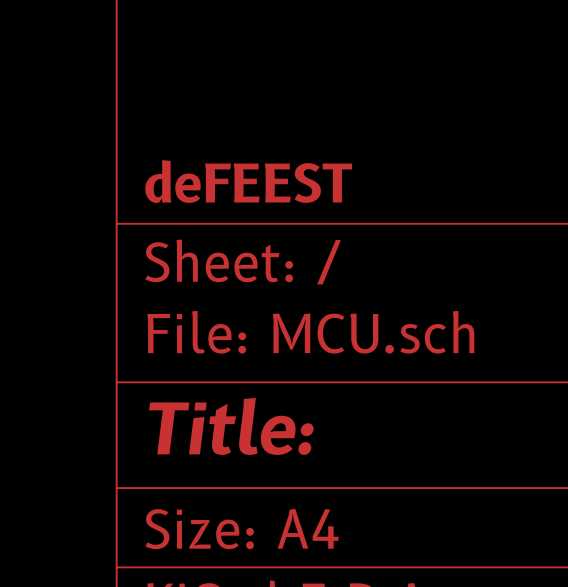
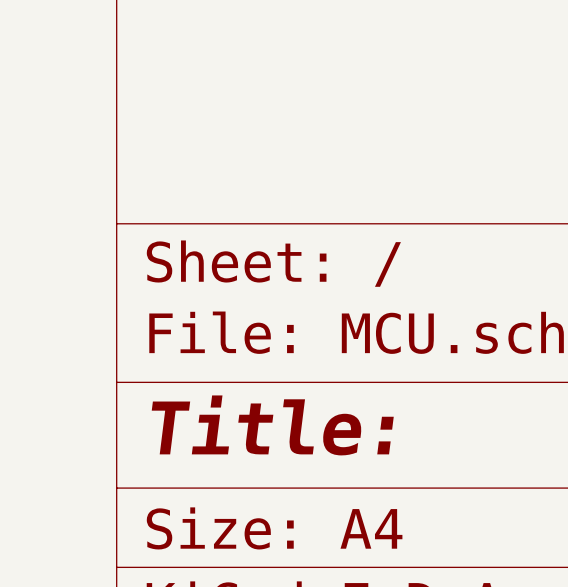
title block: deFEEST (248, 181) -> none

